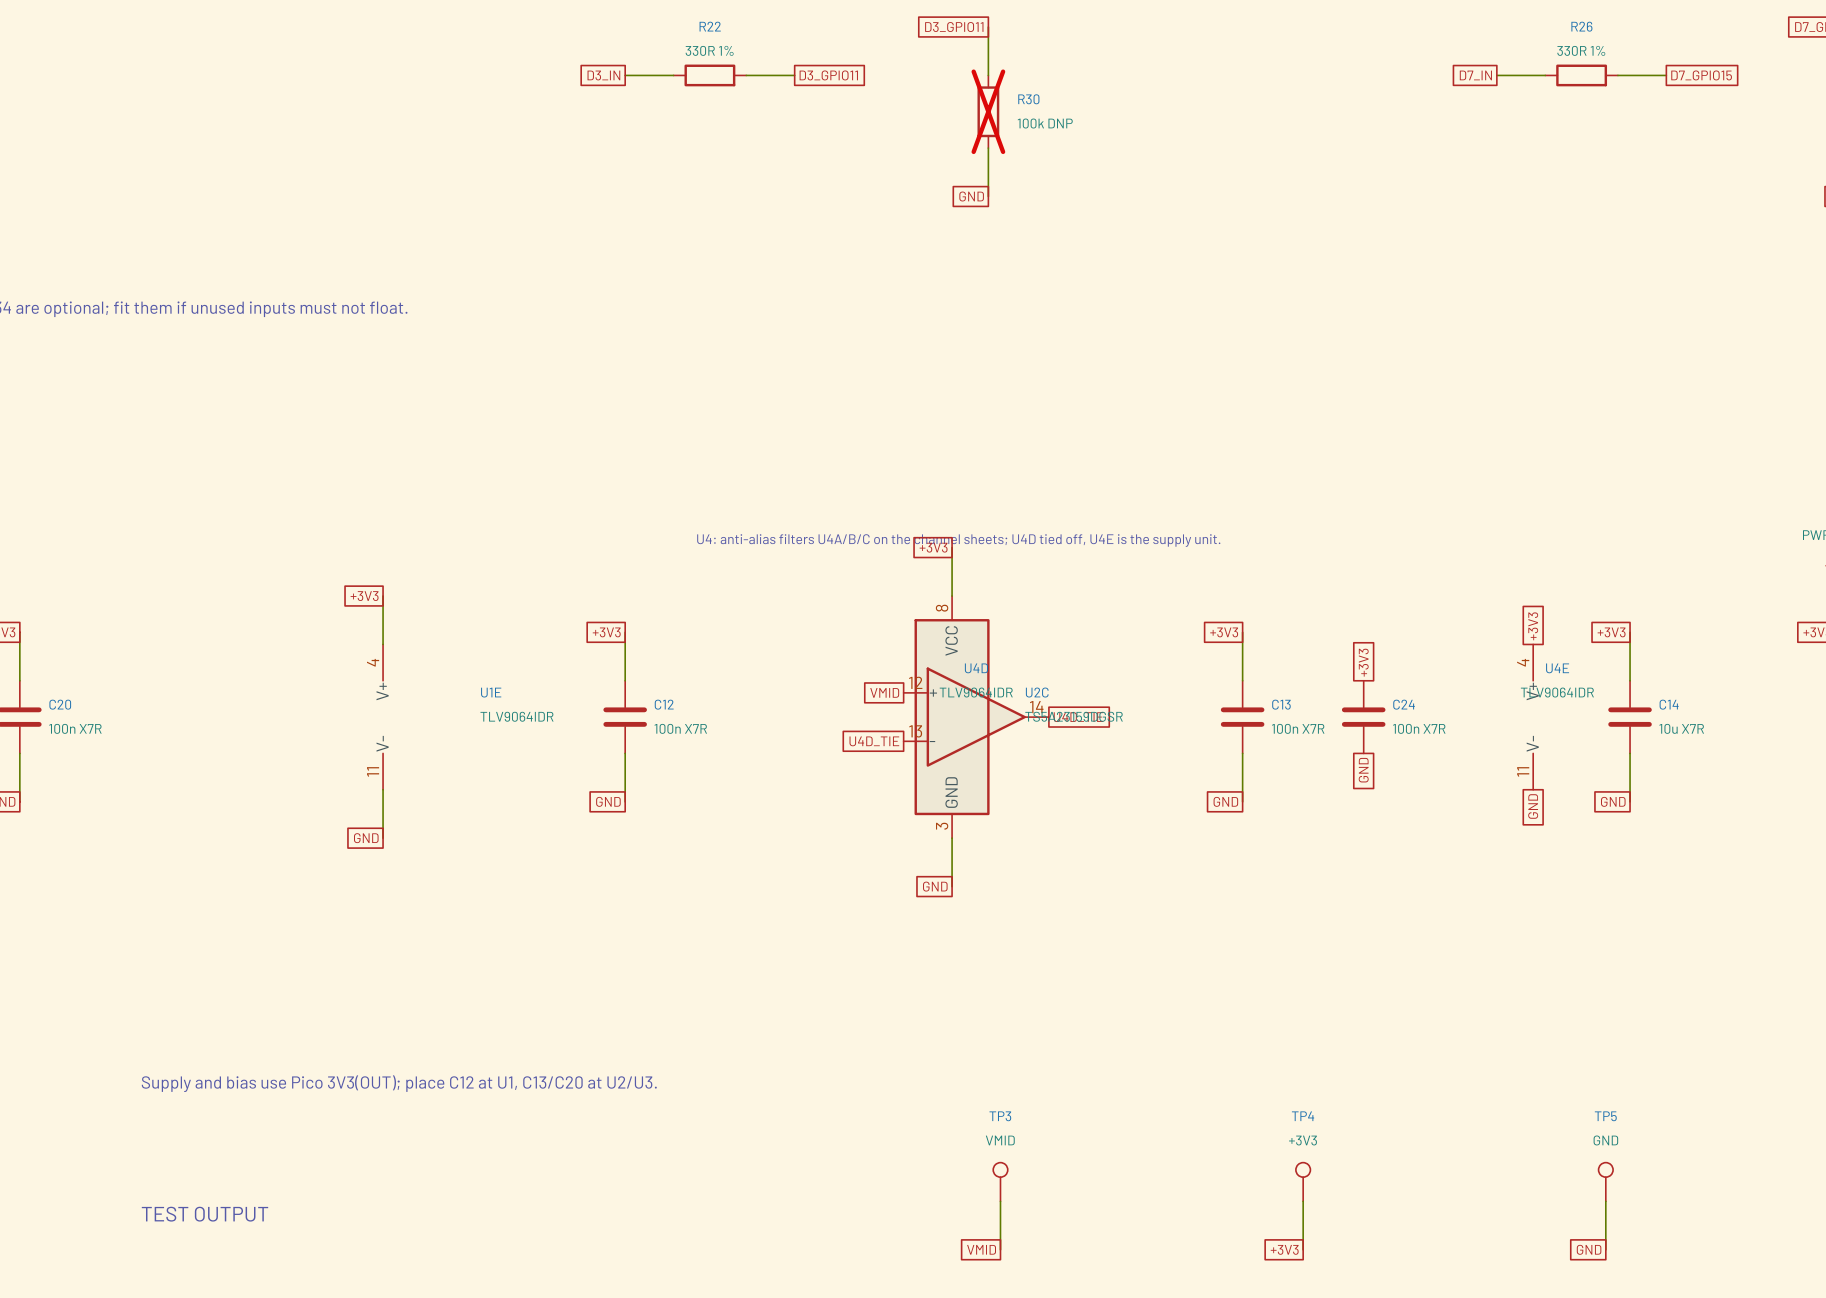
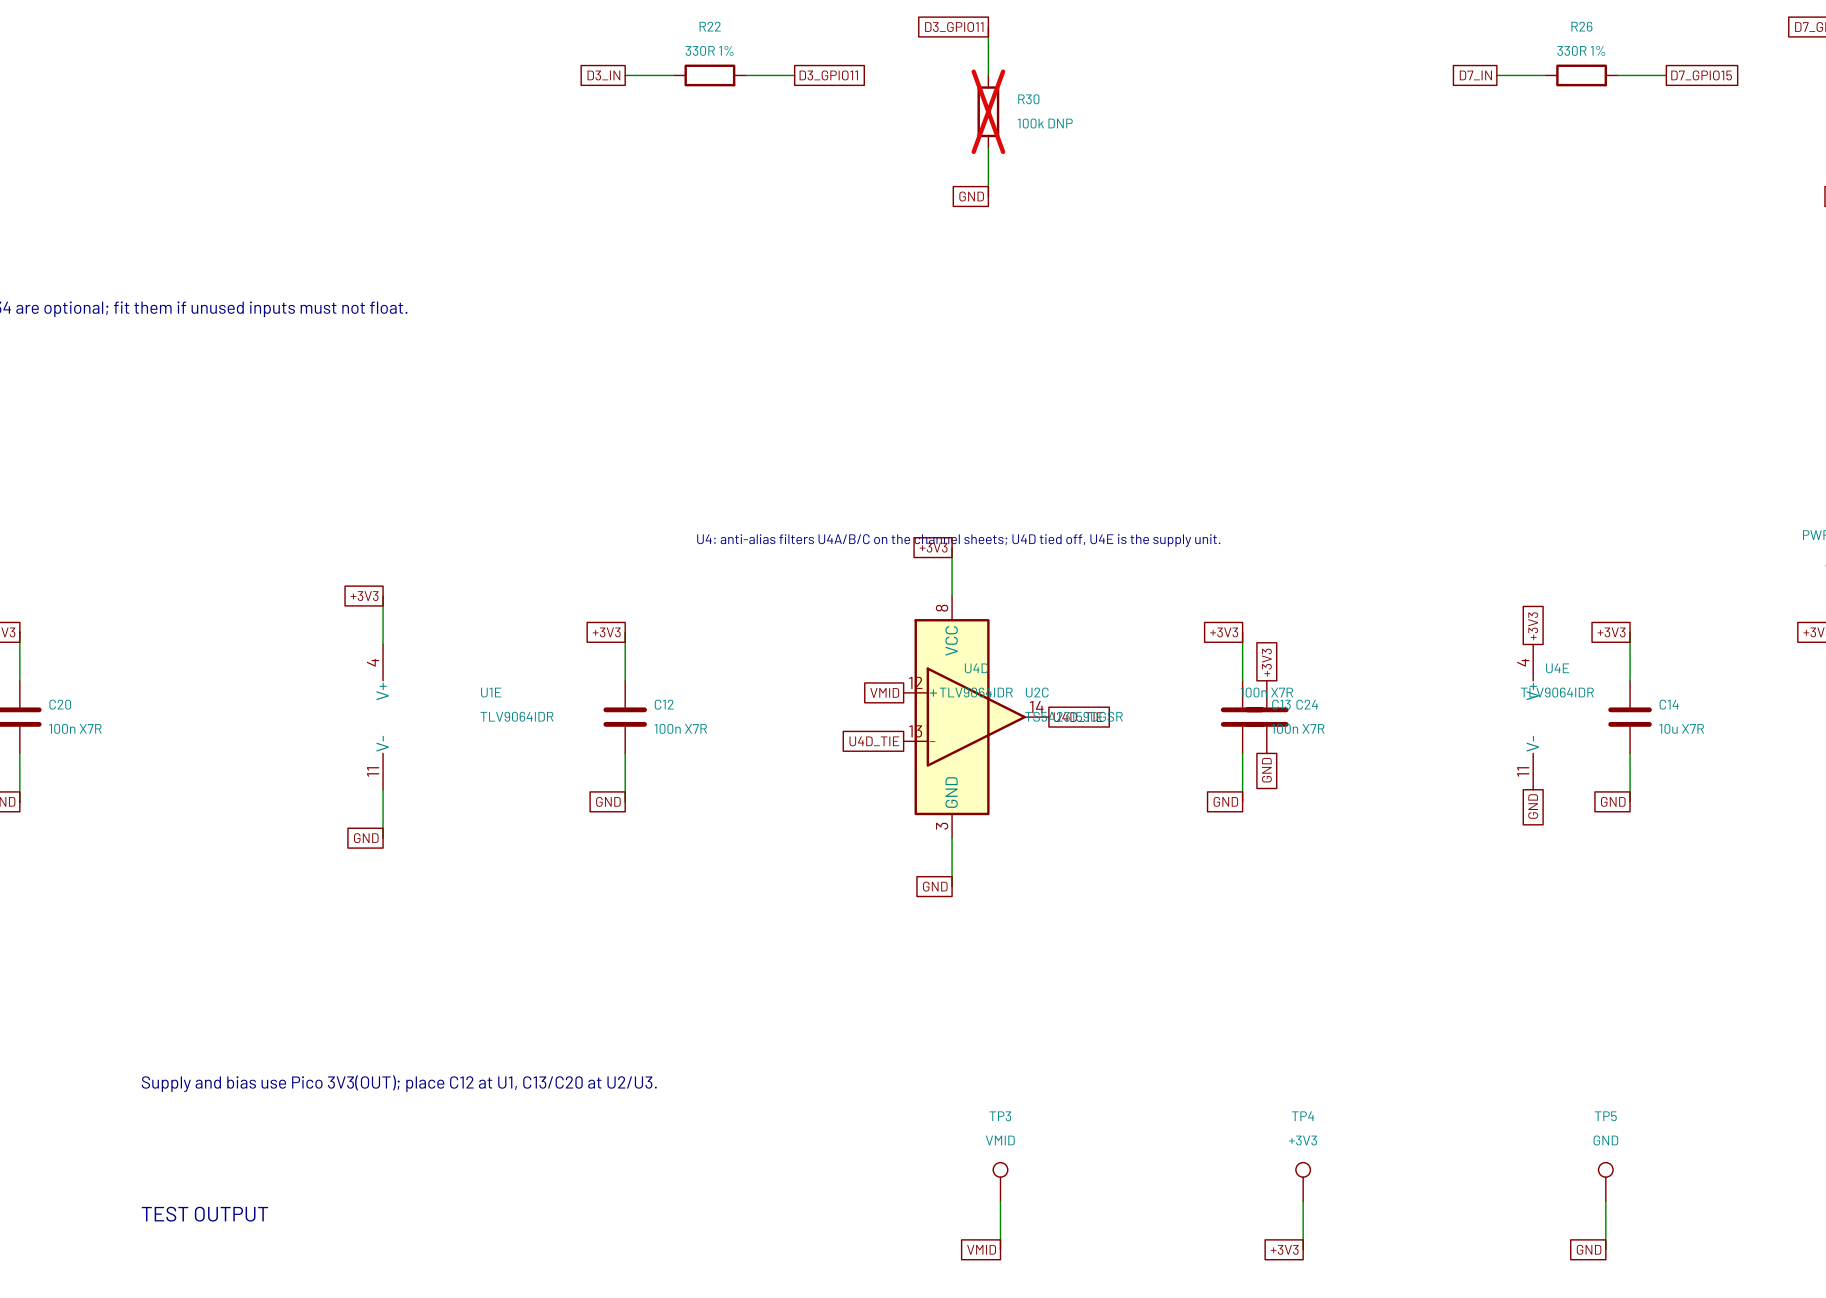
global label position: +3V3 (1363, 662) -> +3V3 (1266, 662)
C24 position: (1363, 717) -> (1266, 717)
C24 value position: 100n X7R (1419, 728) -> 100n X7R (1266, 692)
global label position: GND (1363, 770) -> GND (1266, 770)

